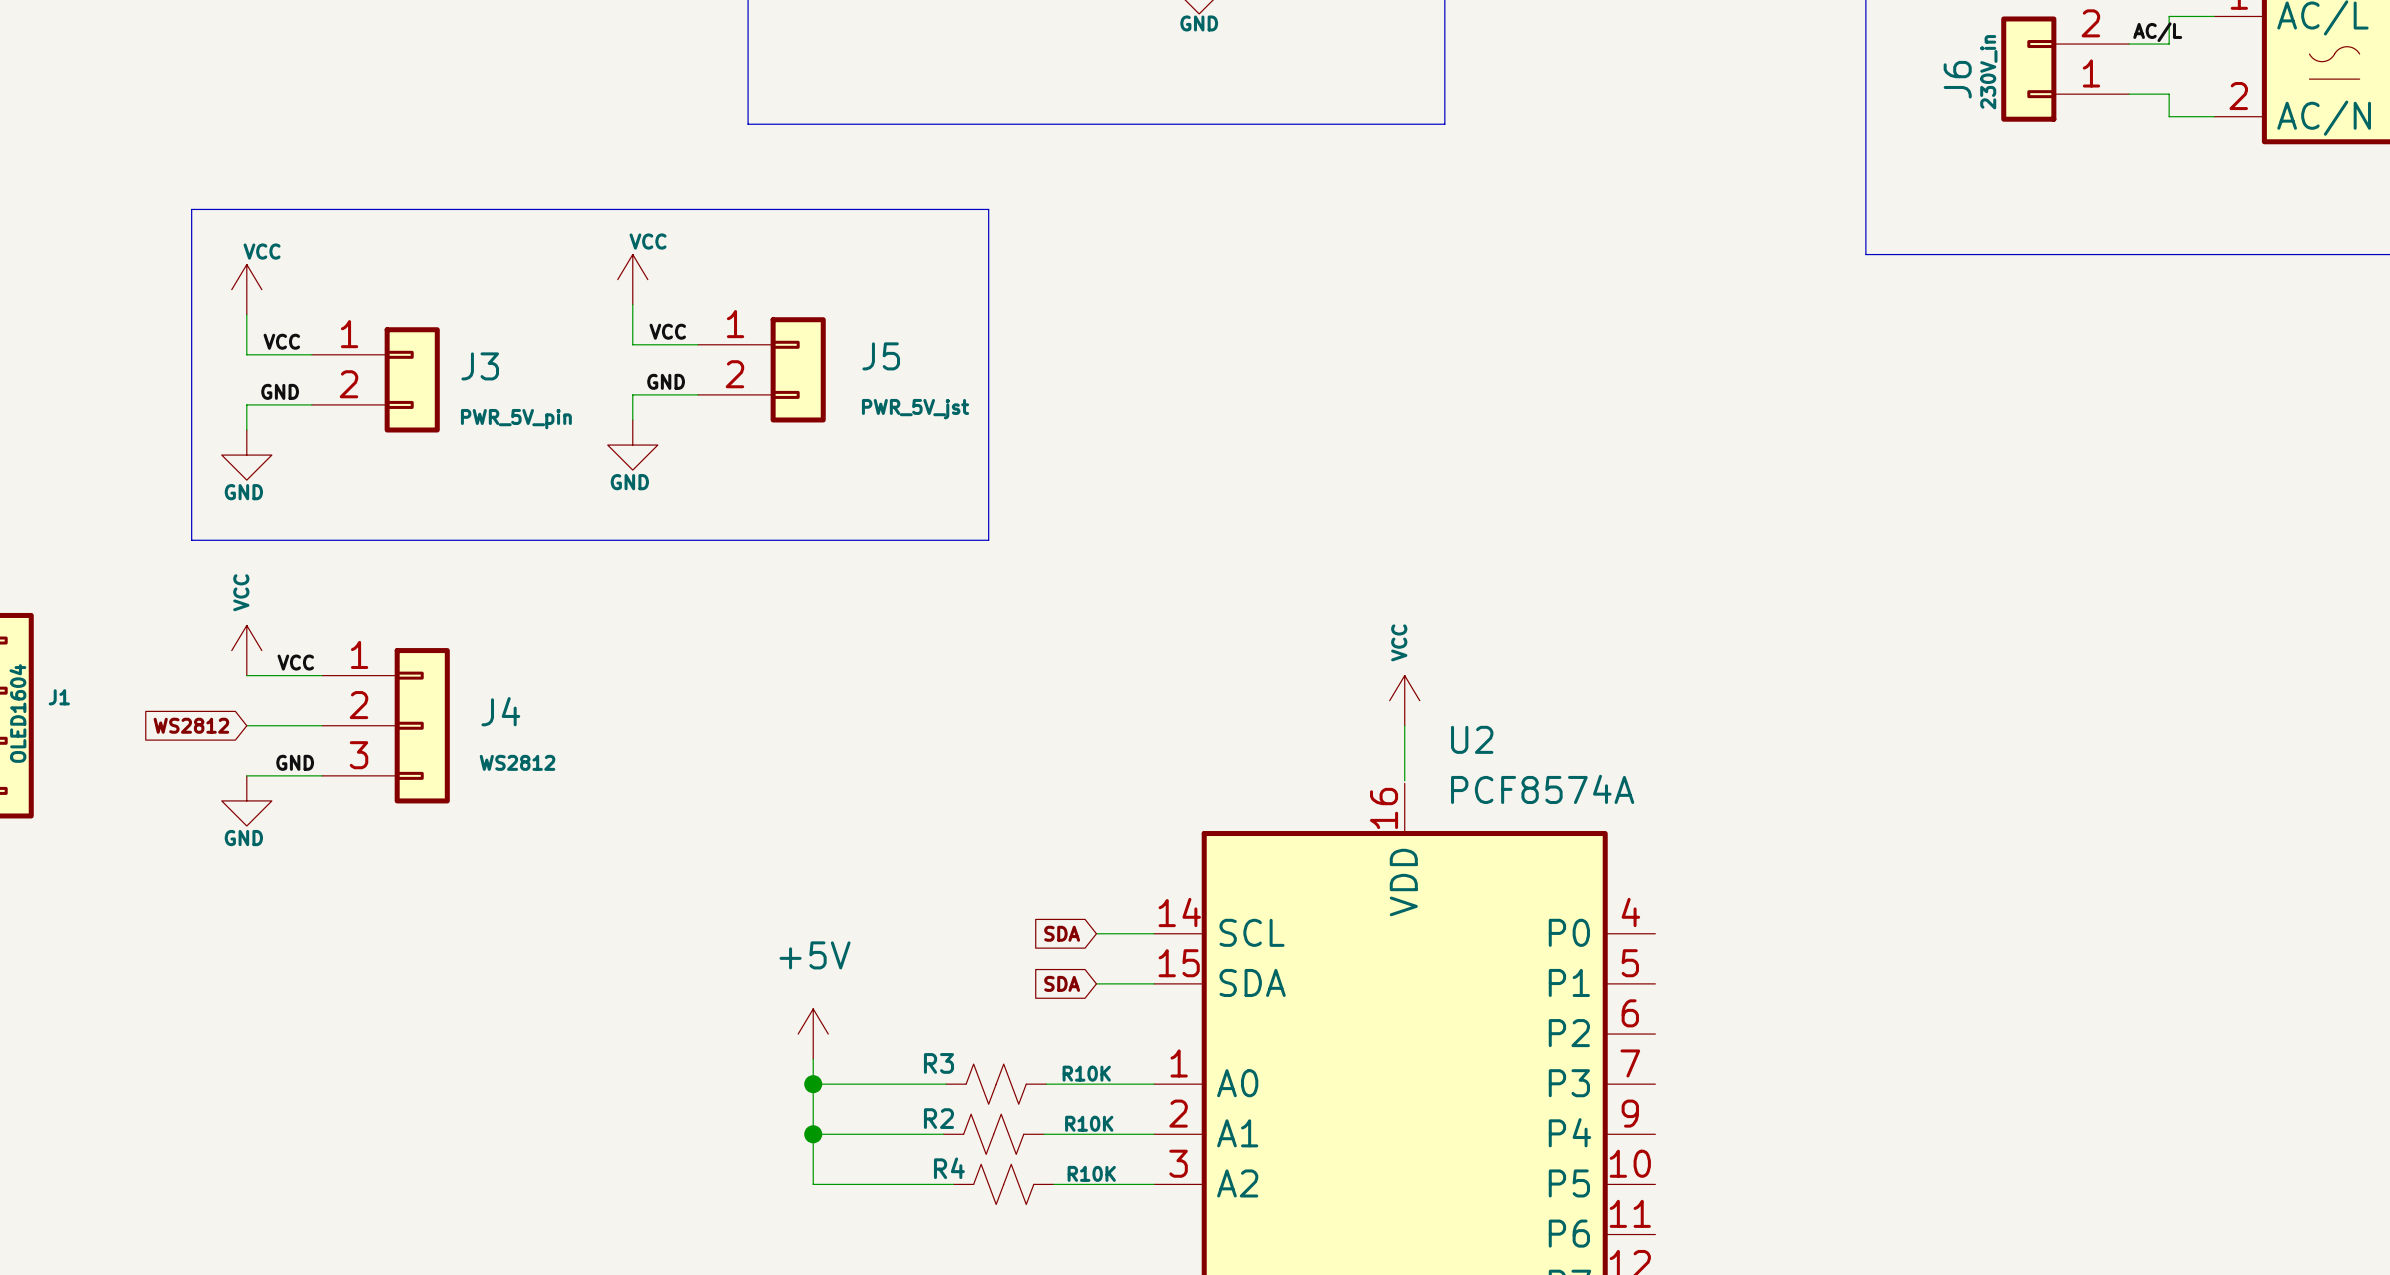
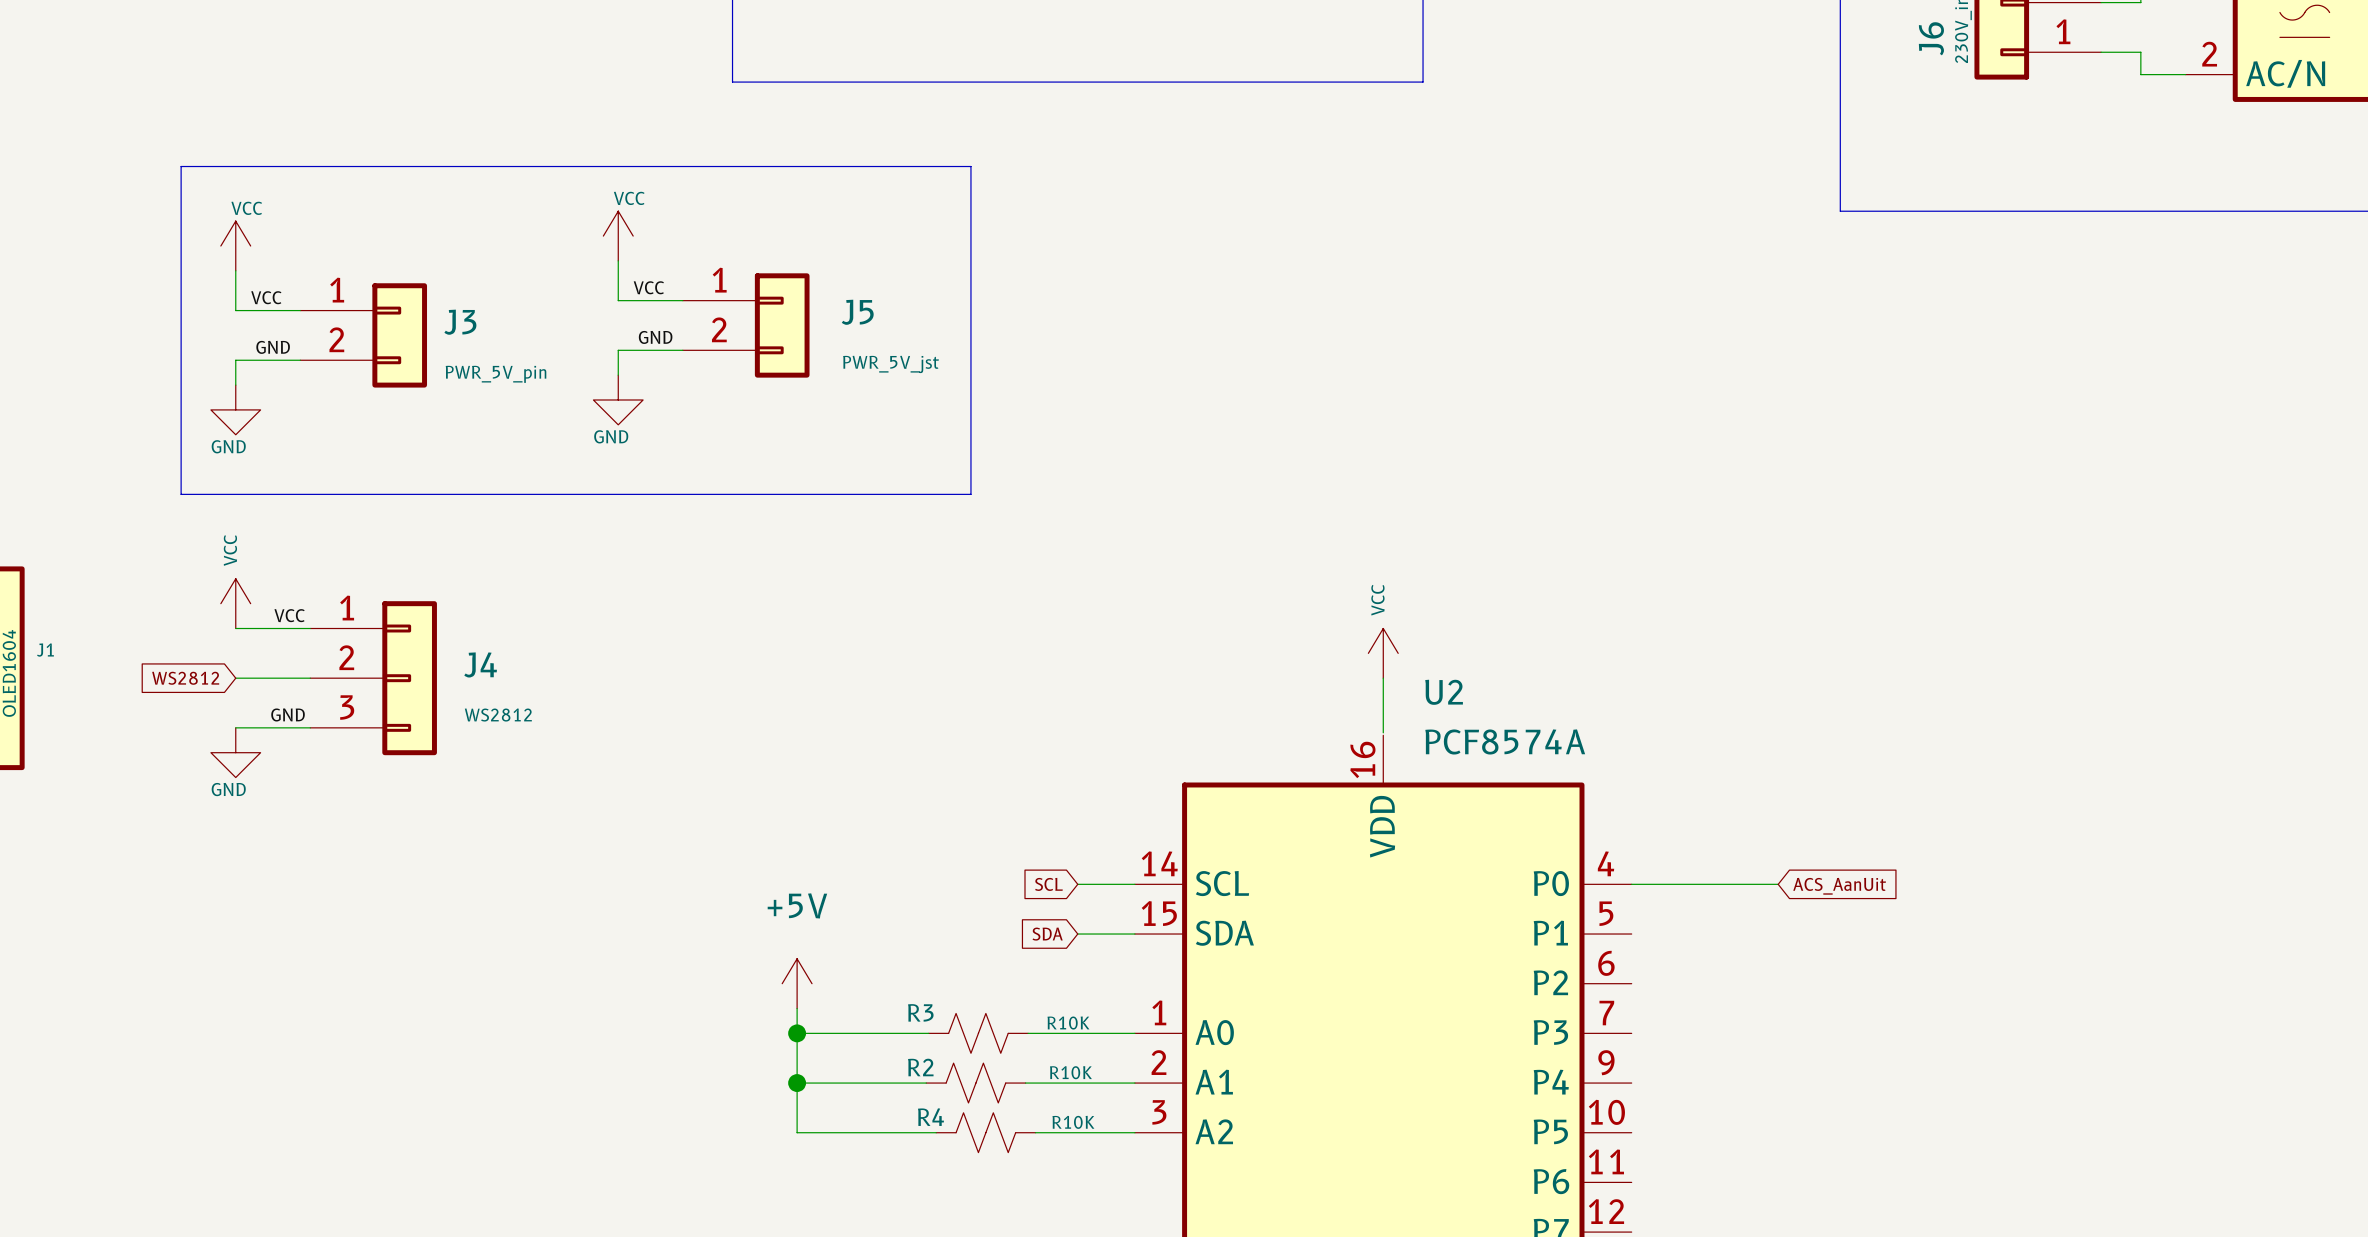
global label: SDA (1062, 933) -> SCL (1048, 884)
wire: none -> (1631, 884) (1778, 884)
global label: none -> ACS_AanUit (1839, 886)

